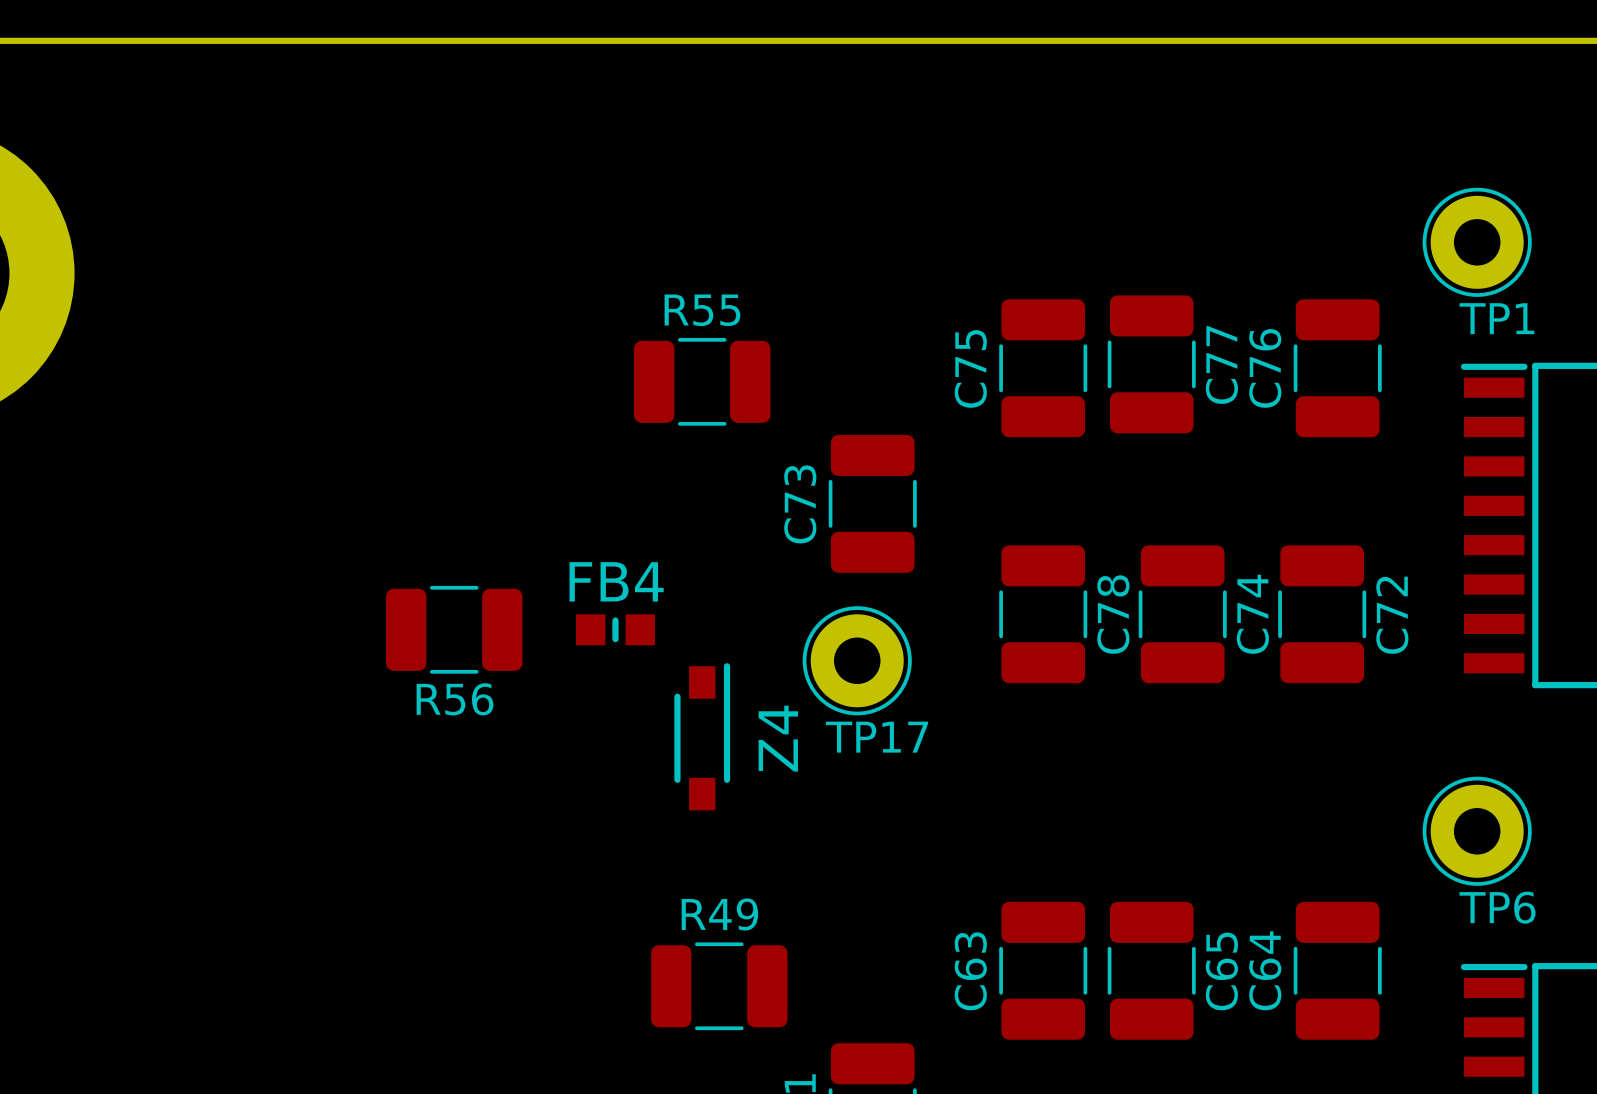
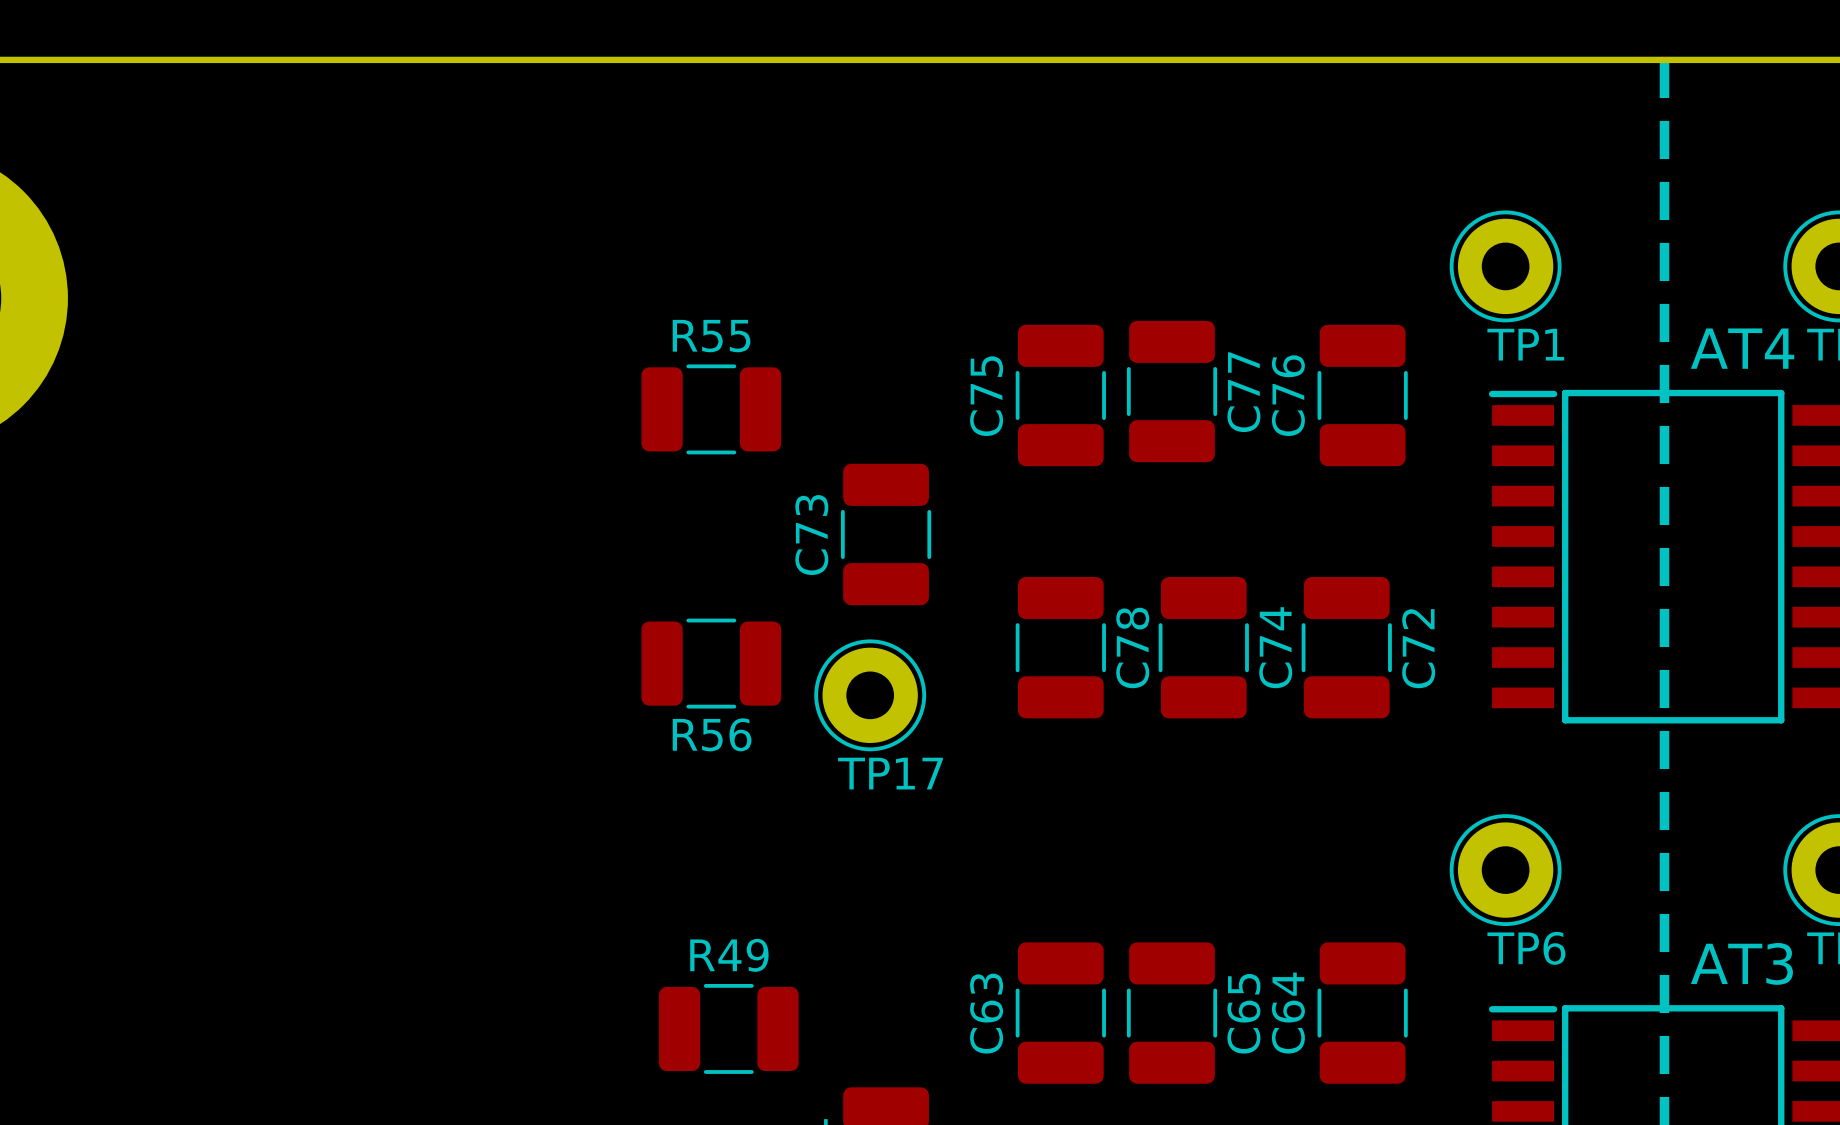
R56 position: (454, 629) -> (711, 663)
FB4: (615, 629) -> none
Z4: (702, 736) -> none

